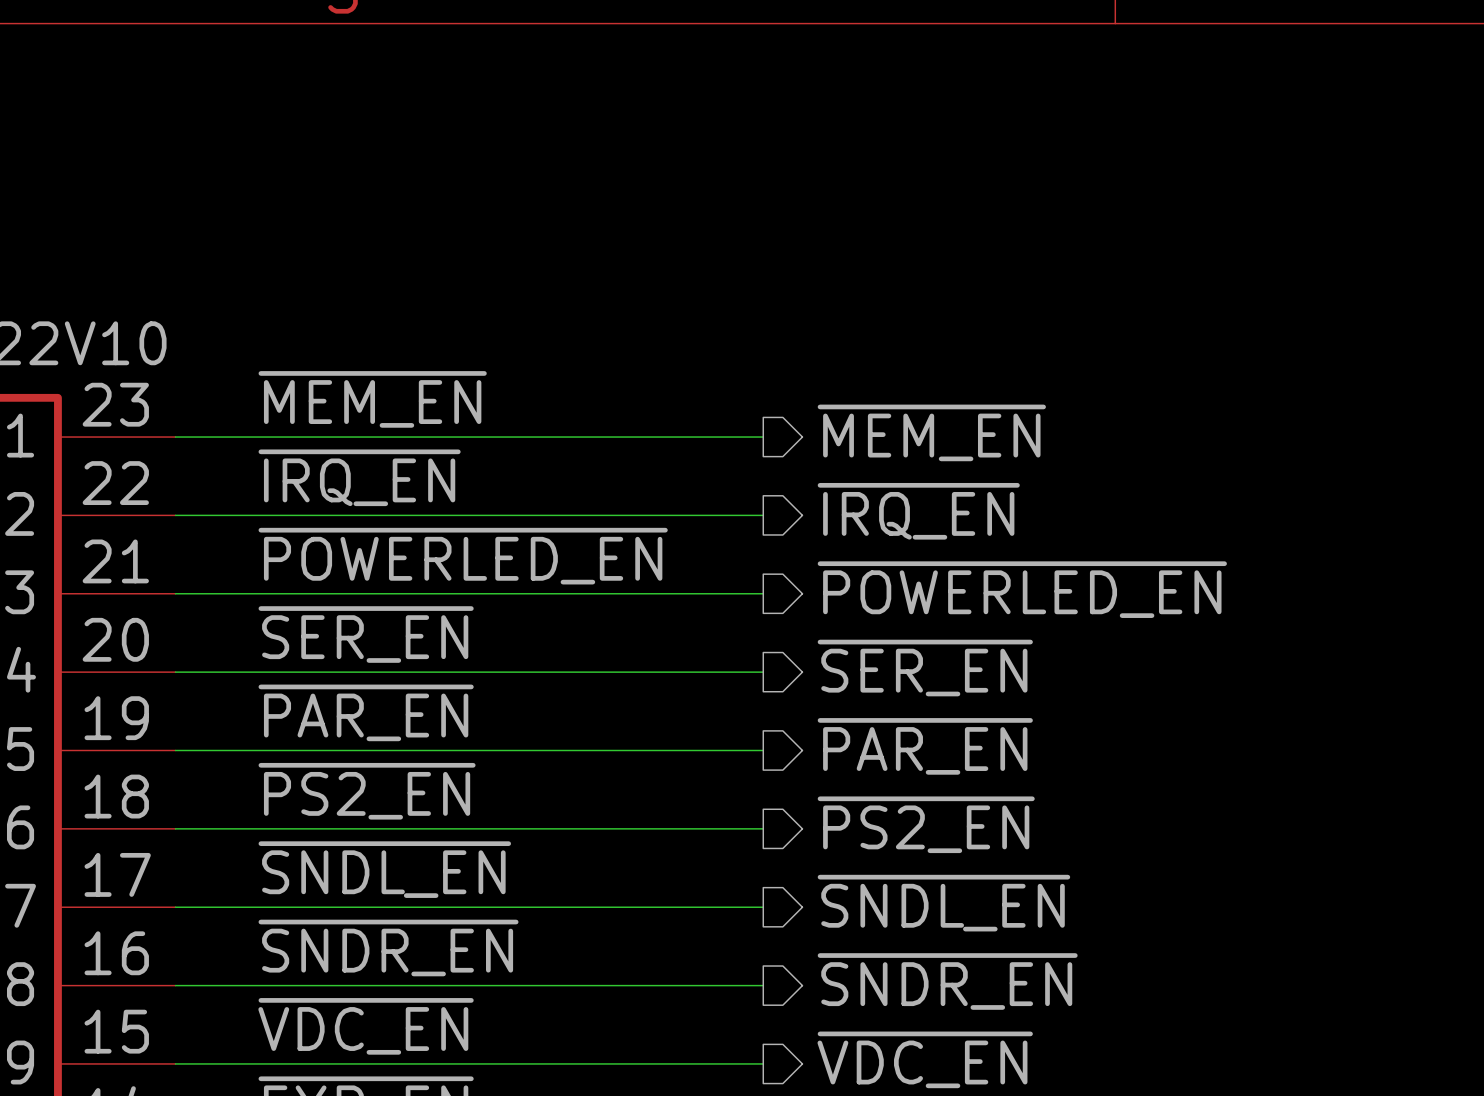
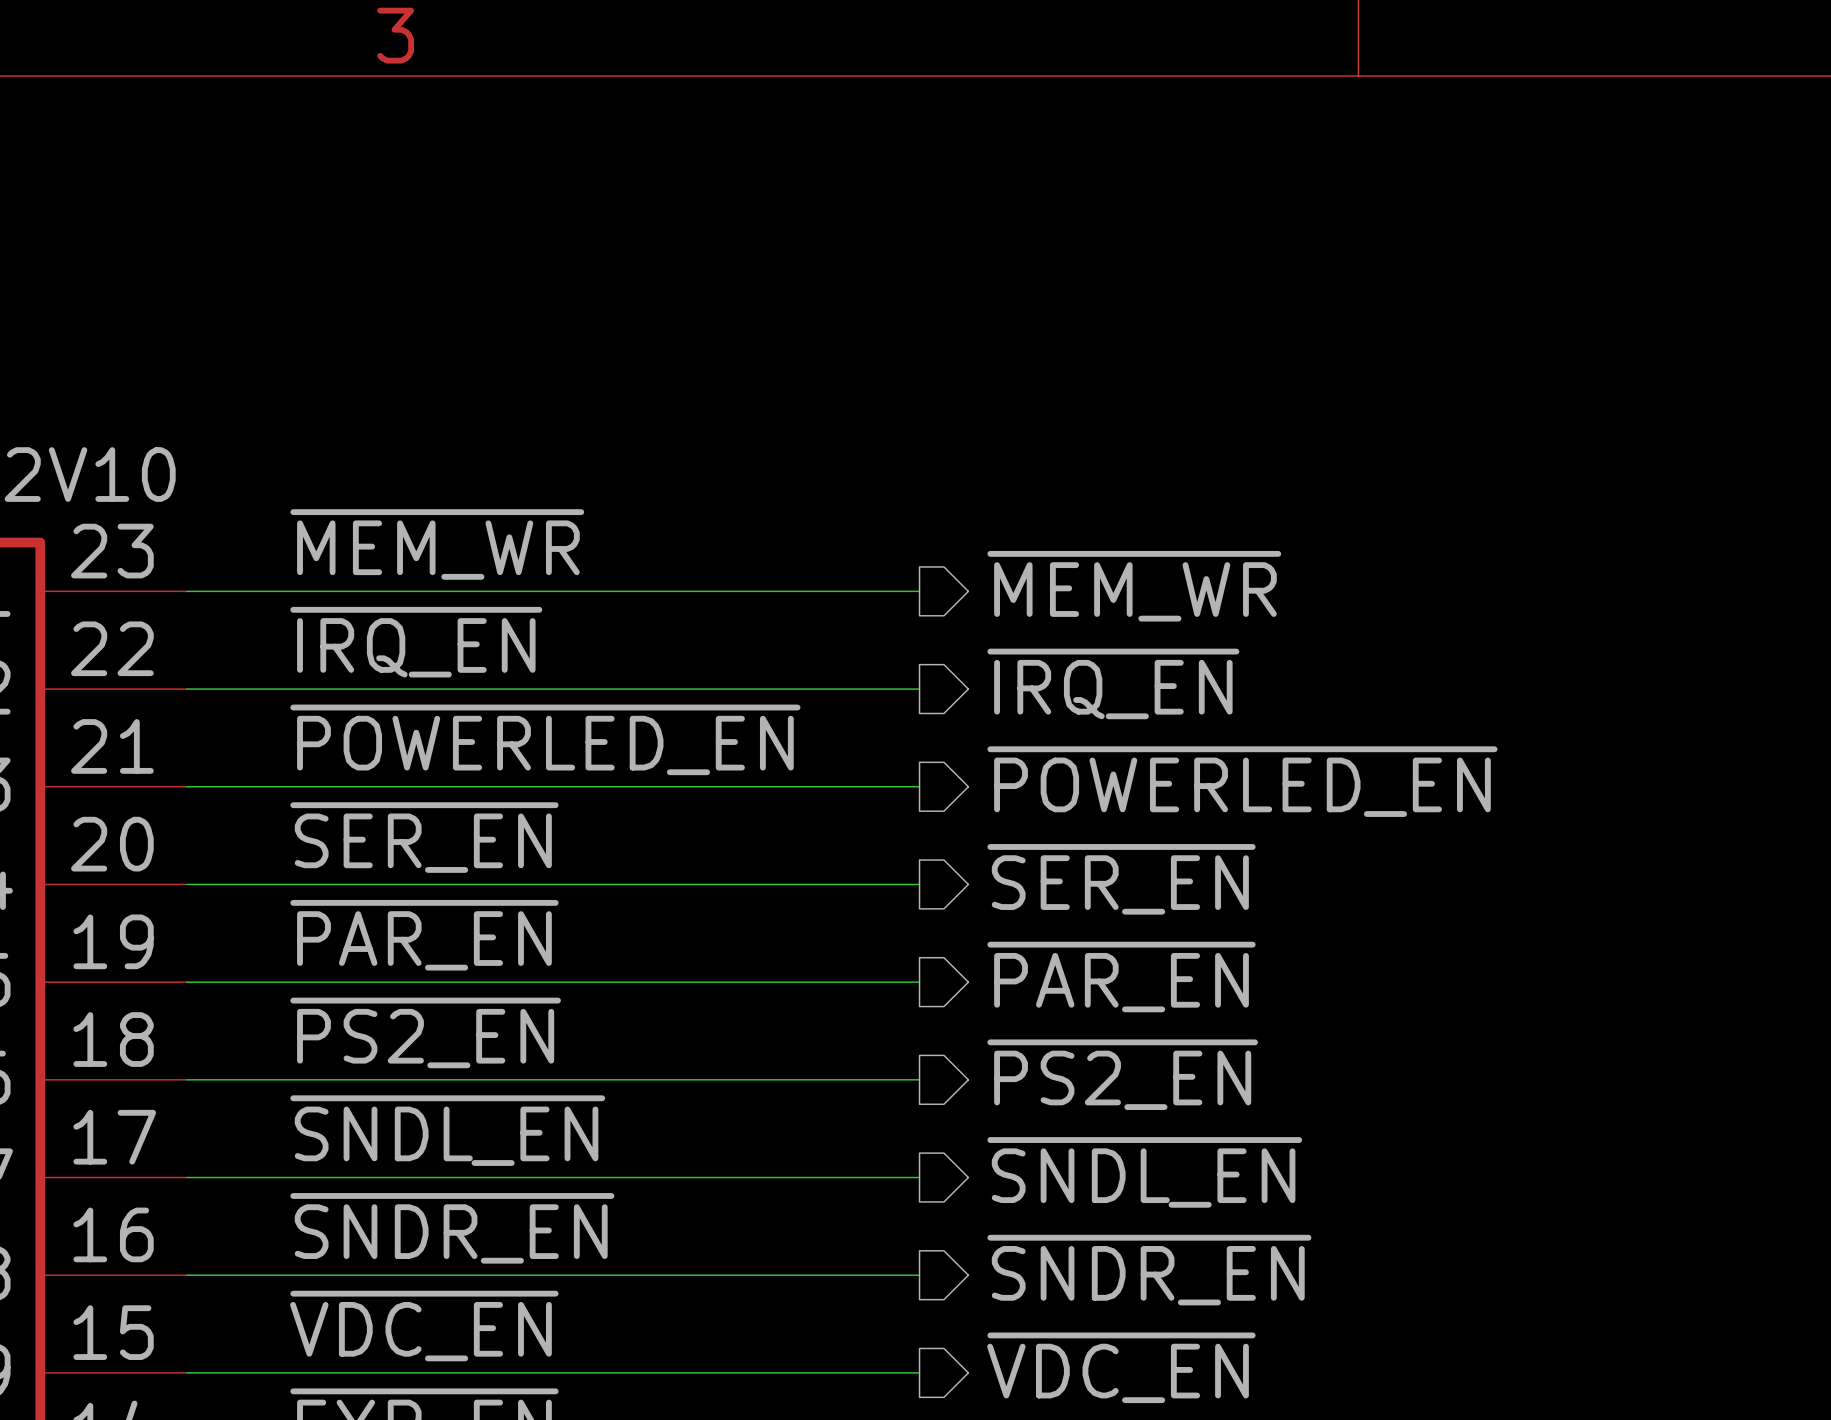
label: ~{MEM_EN} (372, 399) -> ~{MEM_WR} (437, 544)
hierarchical label: ~{MEM_EN} (931, 432) -> ~{MEM_WR} (1134, 586)

